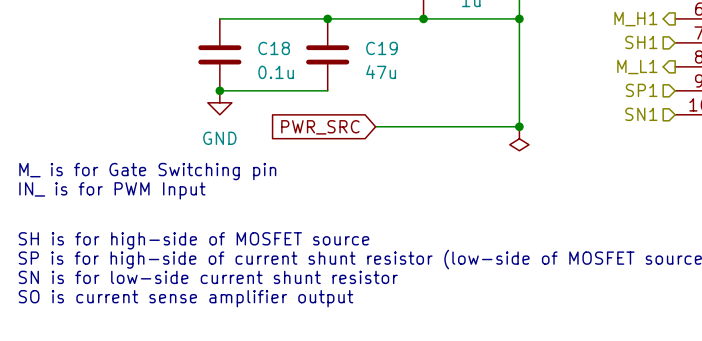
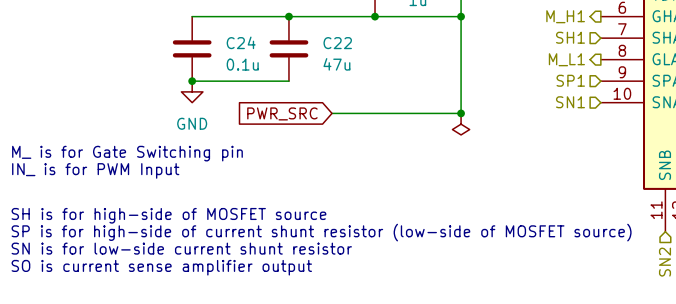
C18 name: C18 (274, 48) -> C24 (241, 42)
C19 name: C19 (381, 48) -> C22 (337, 43)

